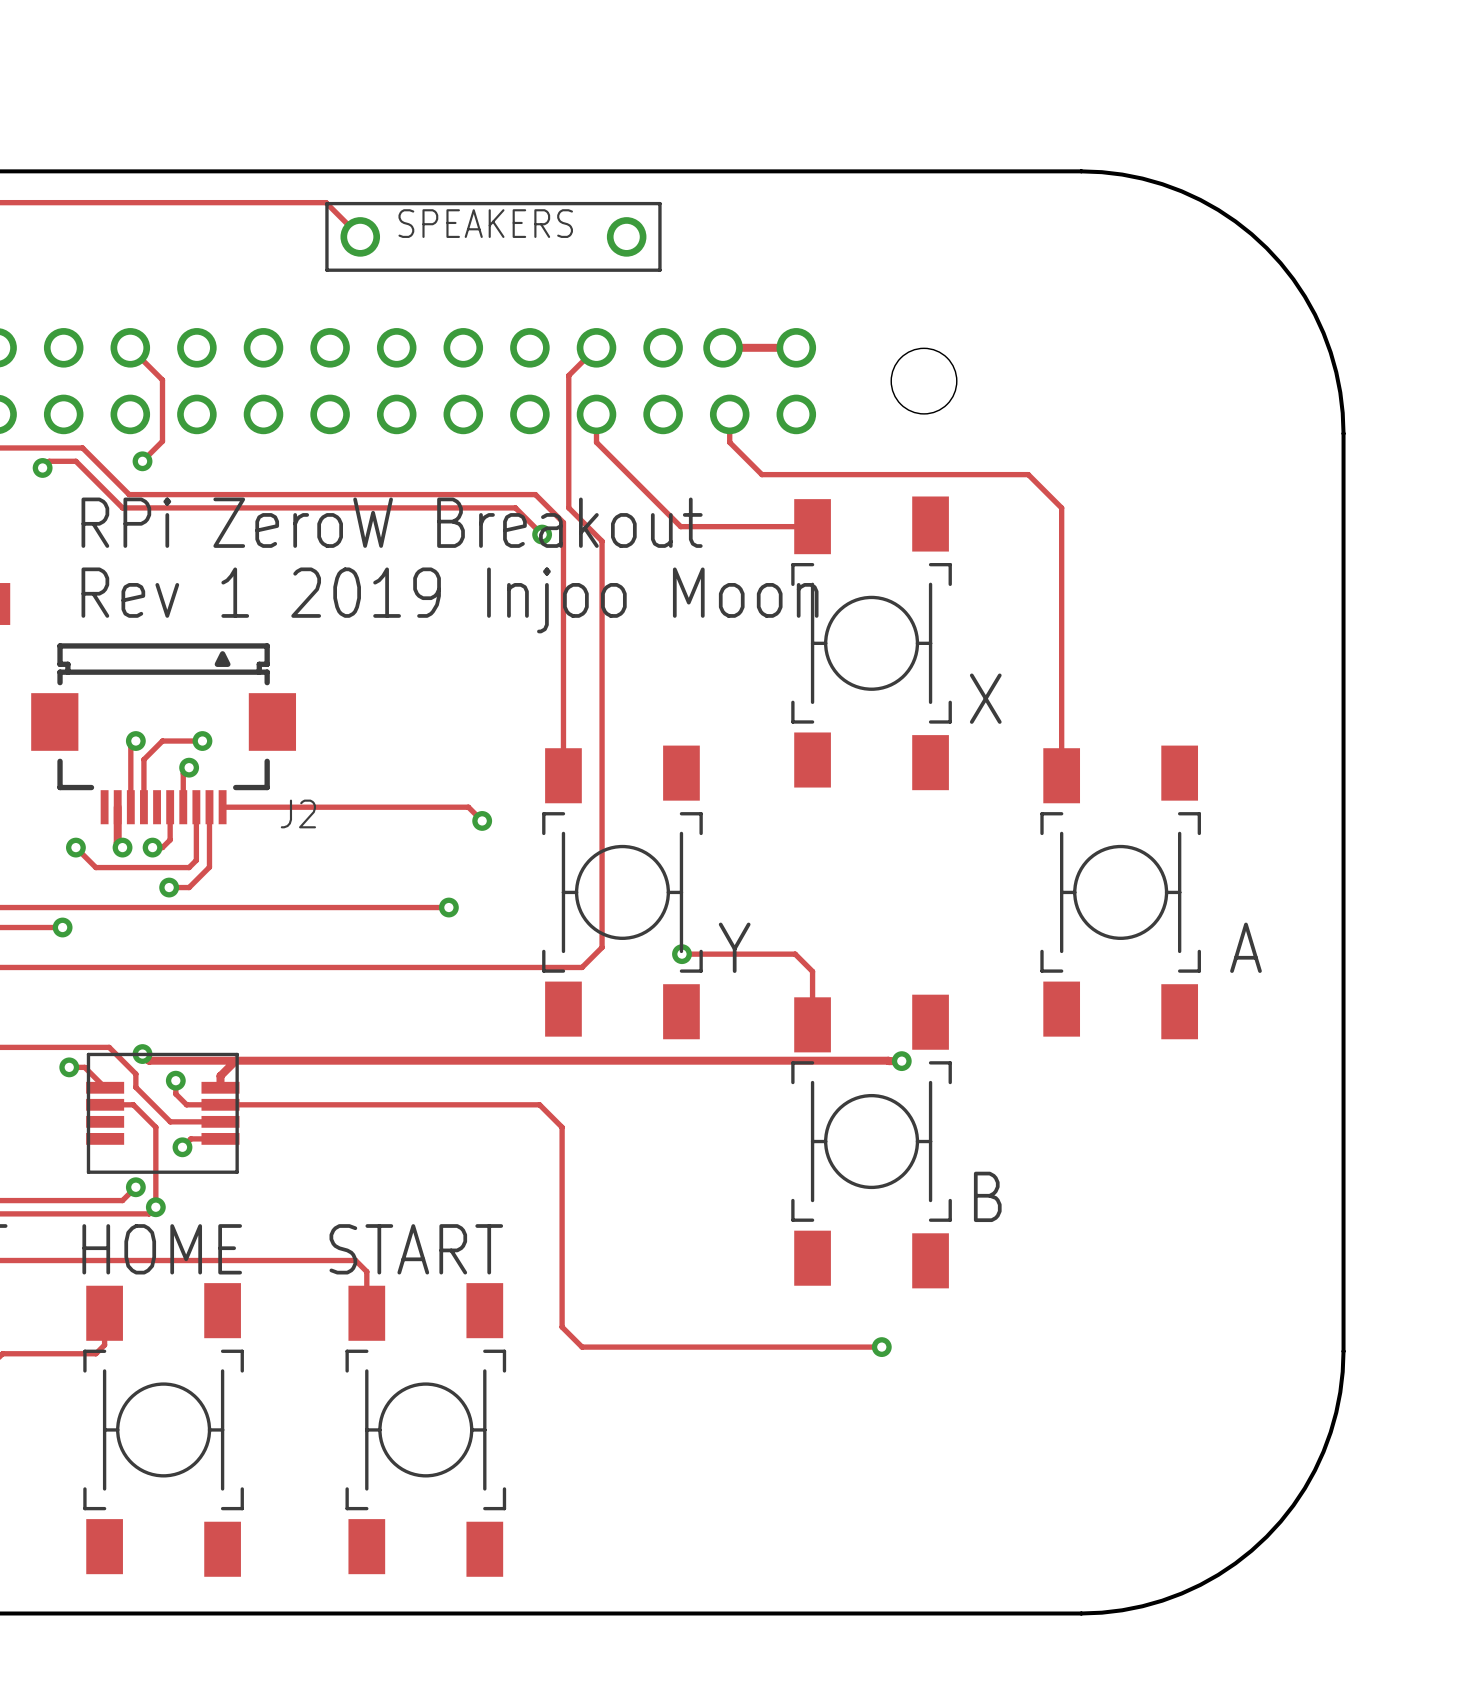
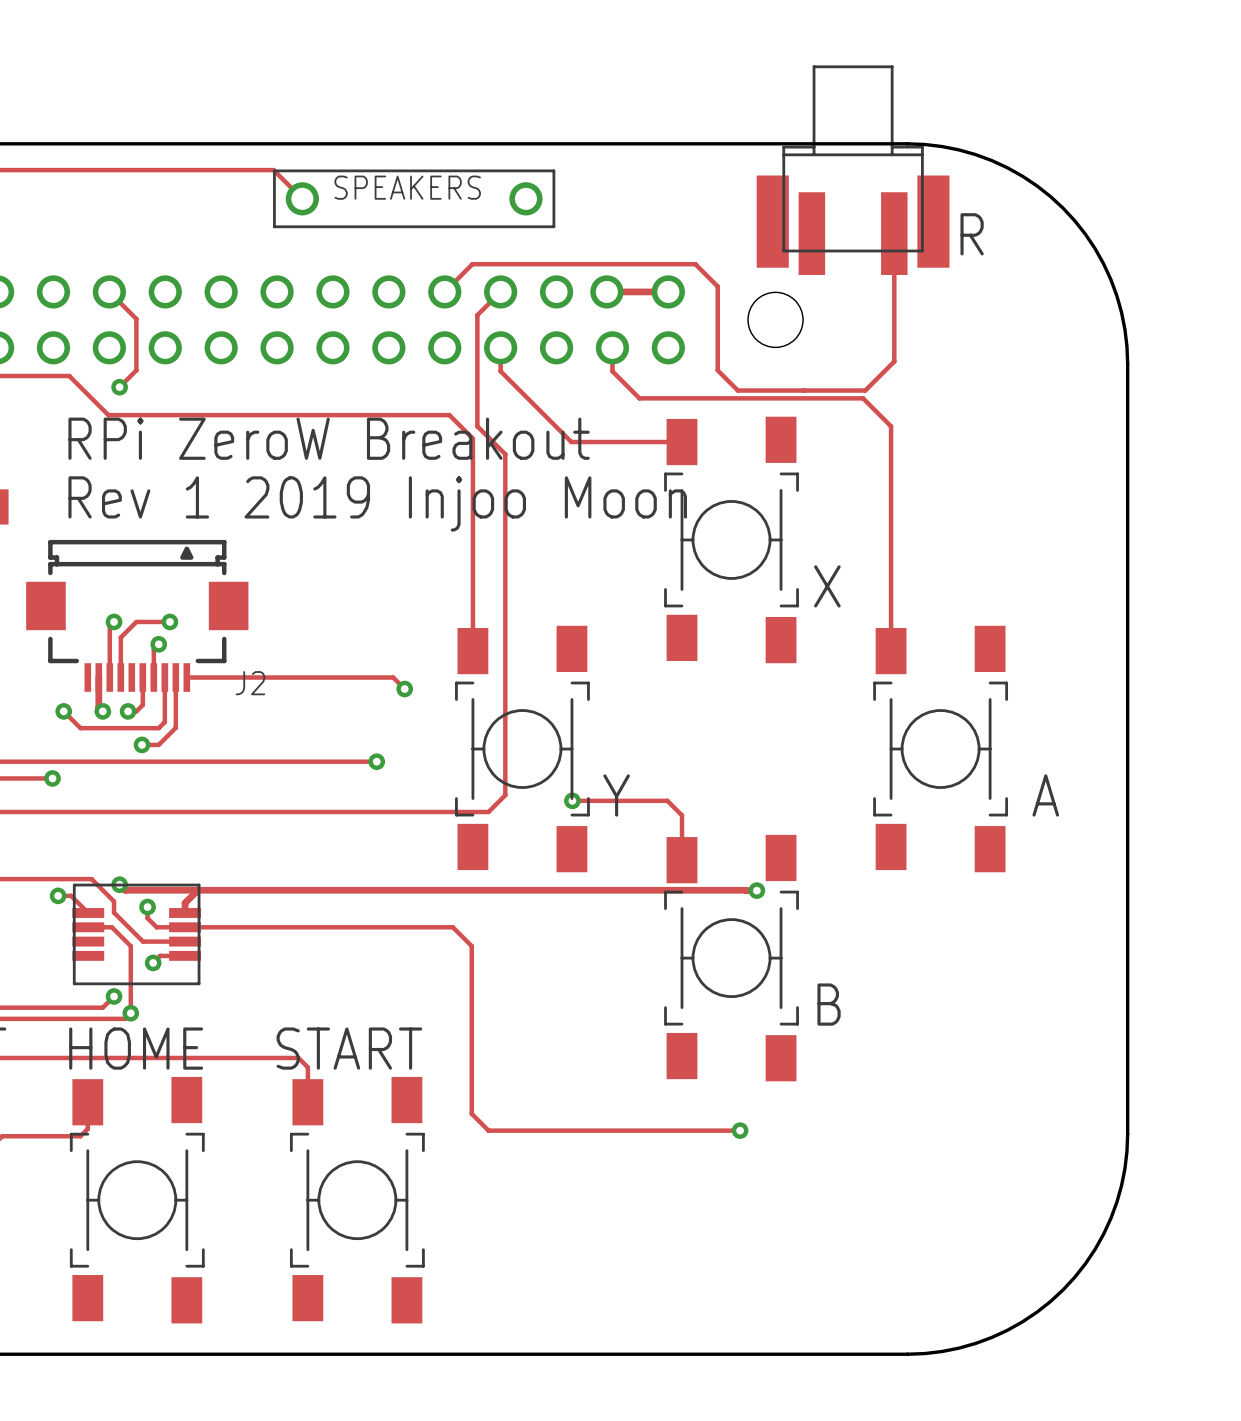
part: none -> (853, 170)
track: none -> (894, 233) (894, 361) (865, 390) (737, 390) (717, 370) (717, 286) (695, 264) (472, 264) (444, 291)
text: none -> R (972, 234)
track: (42, 467) (49, 461) (75, 461) (122, 507) (515, 507) (542, 534) -> none
via: (42, 467) -> none
via: (542, 534) -> none

